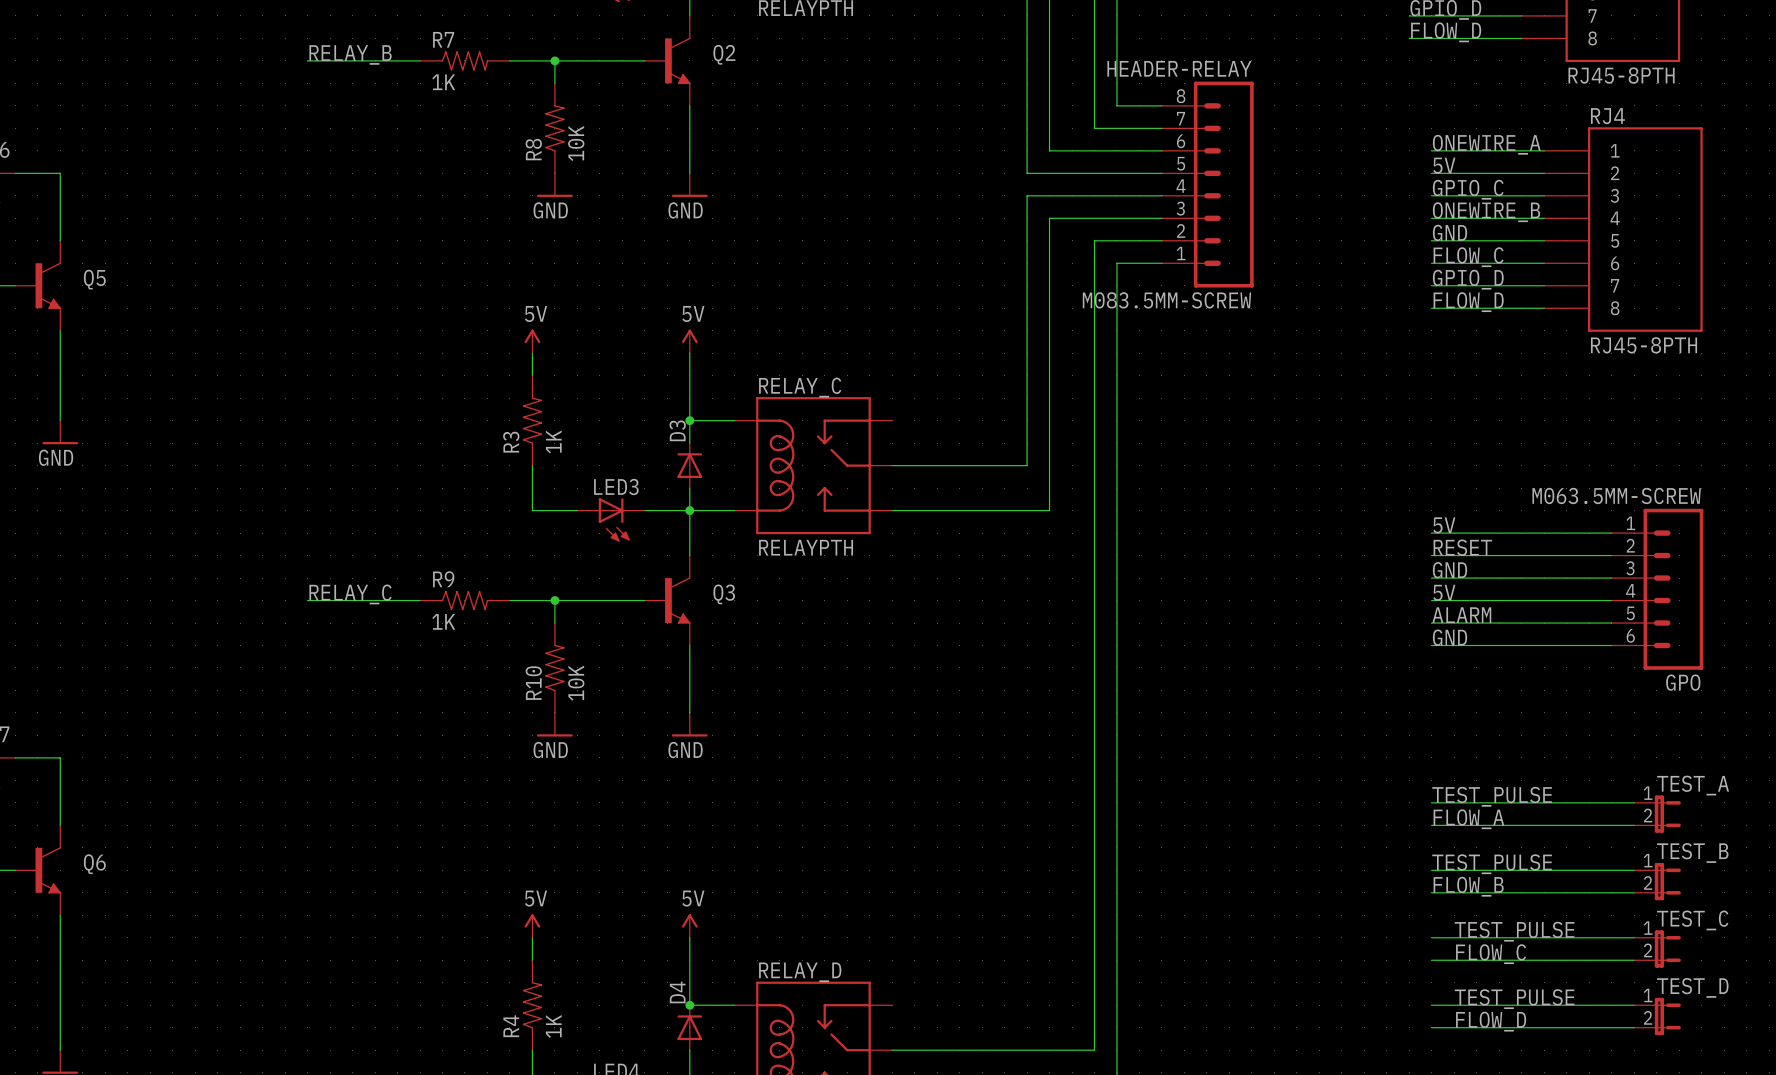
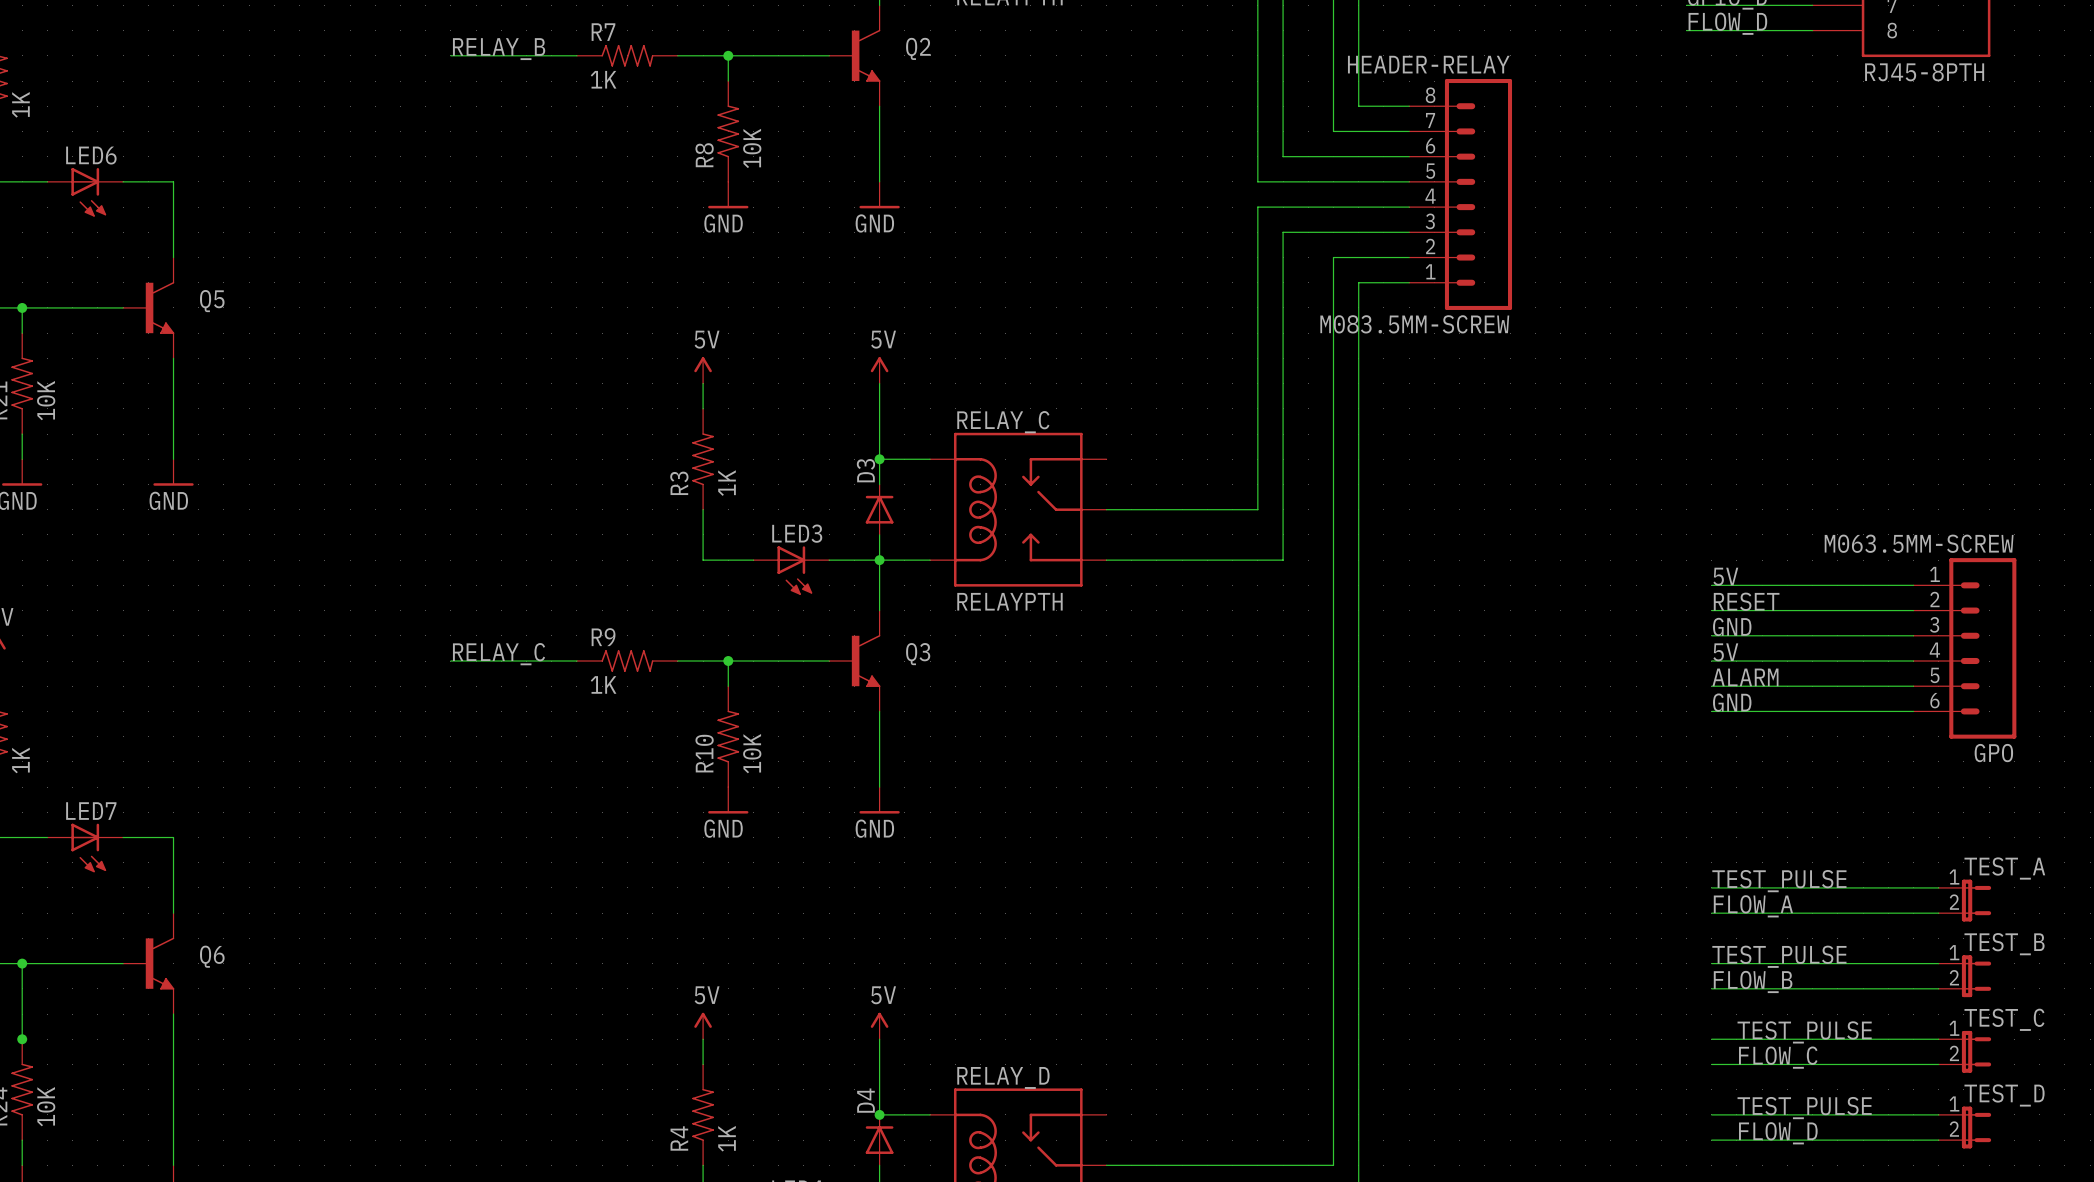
label: ONEWIRE_A (1486, 144) -> none
wire: (1431, 150) (1544, 150) -> none
label: 5V (1444, 165) -> none
wire: (1431, 173) (1544, 173) -> none
label: GPIO_C (1468, 189) -> none
wire: (1431, 195) (1544, 195) -> none
label: ONEWIRE_B (1486, 212) -> none
wire: (1431, 218) (1544, 218) -> none
RJ4: RJ45-8PTH (1623, 229) -> none
label: GND (1450, 232) -> none
wire: (1431, 240) (1544, 240) -> none
label: FLOW_C (1468, 257) -> none
wire: (1431, 263) (1544, 263) -> none
label: GPIO_D (1468, 279) -> none
wire: (1431, 285) (1544, 285) -> none
label: FLOW_D (1468, 302) -> none
wire: (1431, 308) (1544, 308) -> none

